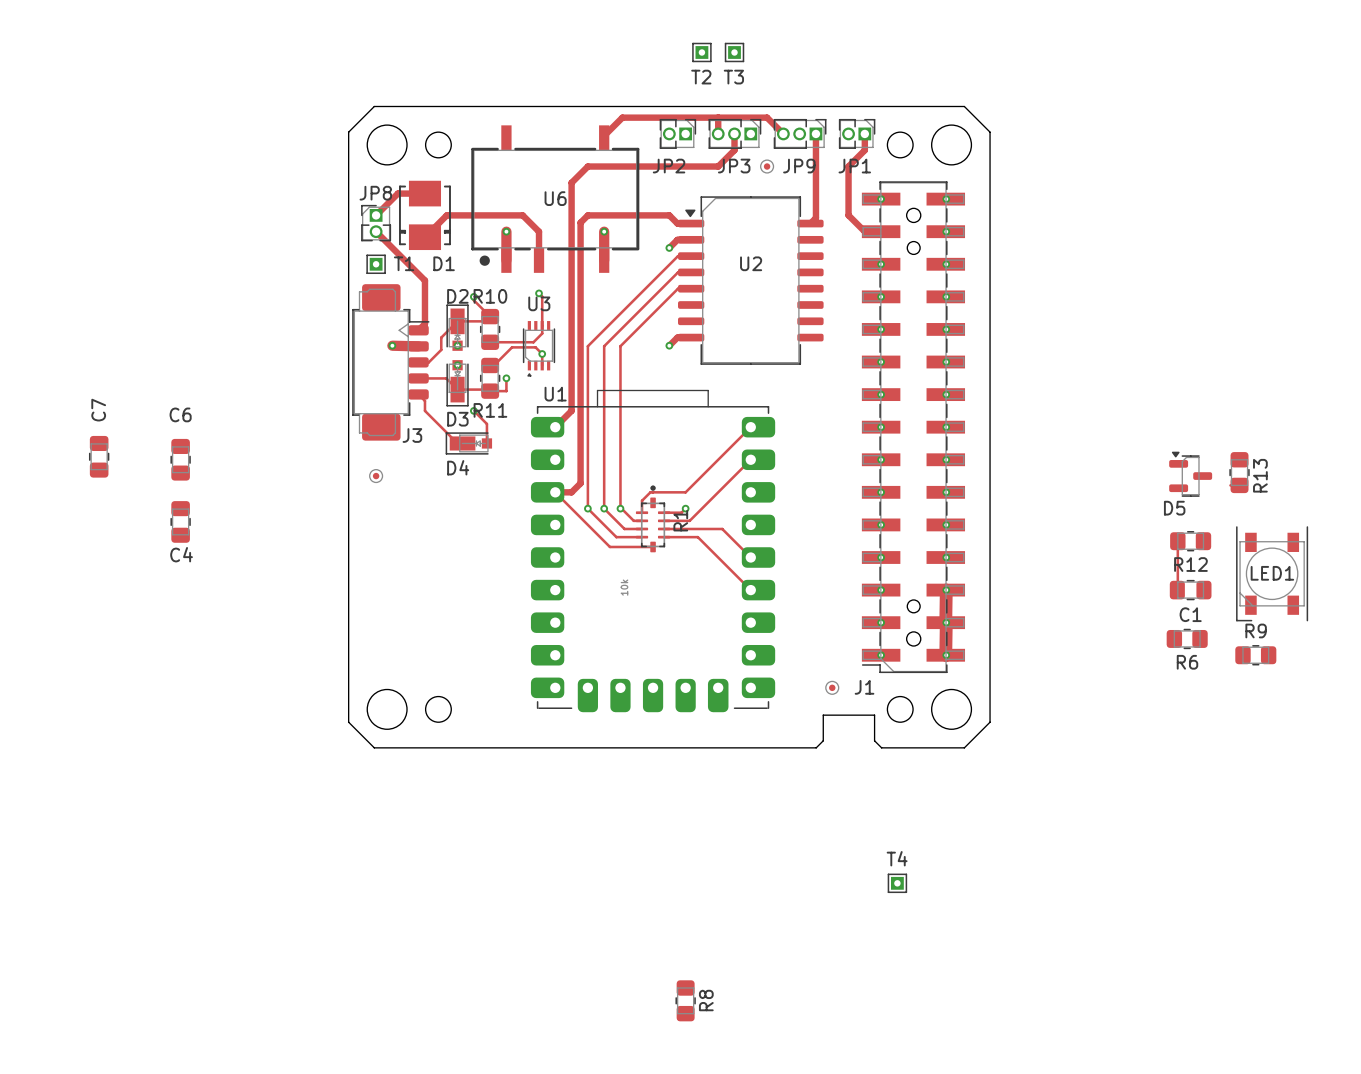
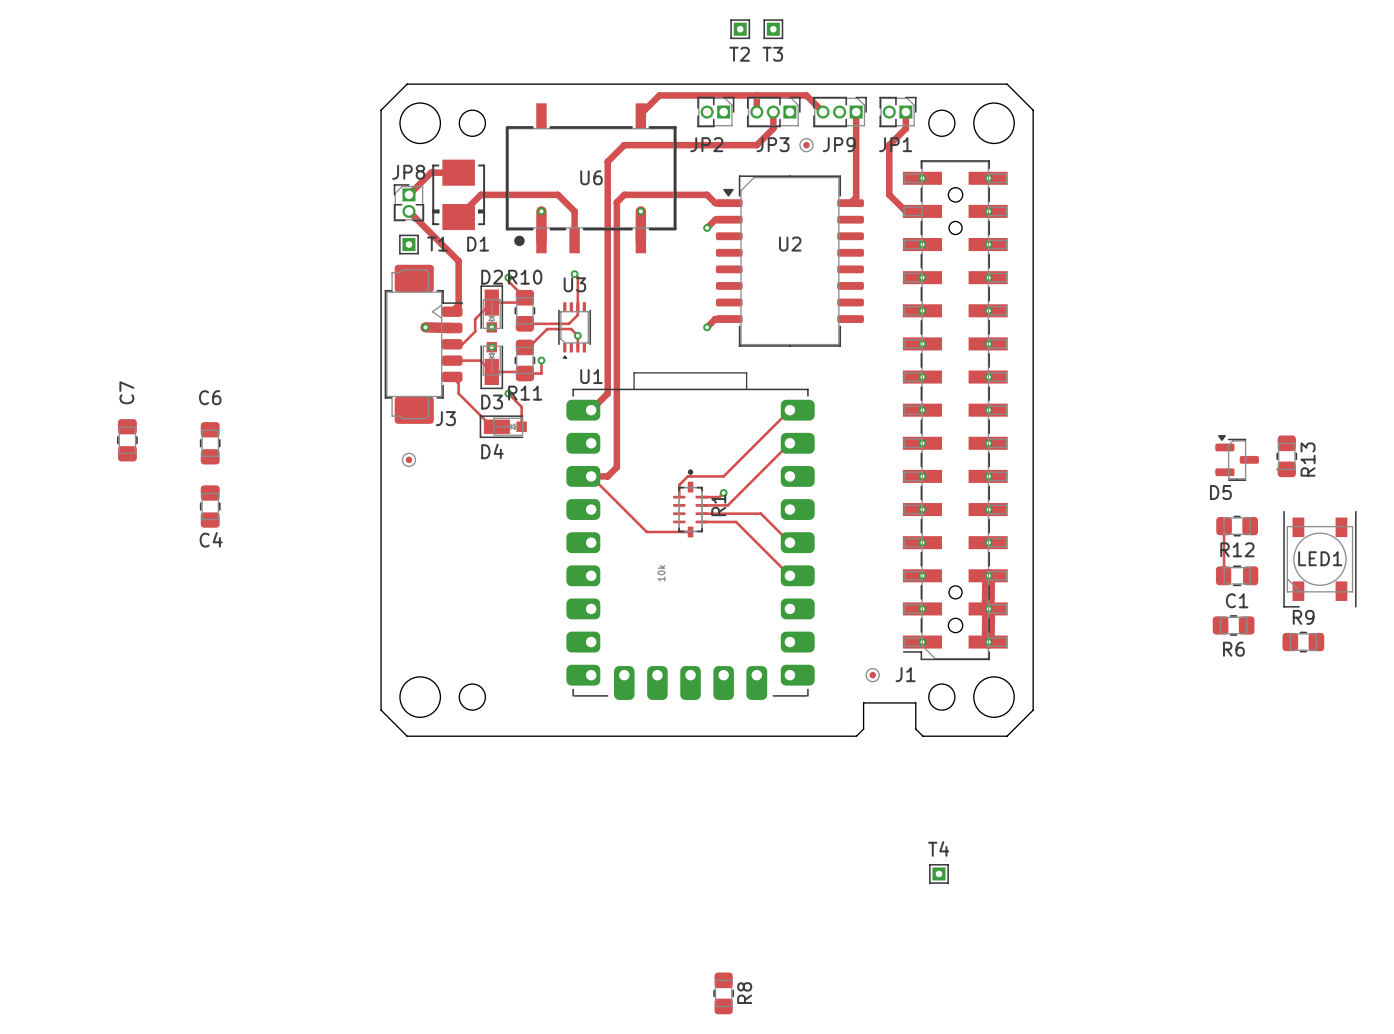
track: (691, 256) (678, 256) (587, 346) (587, 508) (616, 537) (642, 537) -> none
track: (691, 272) (678, 272) (604, 346) (604, 508) (624, 528) (642, 528) -> none
track: (691, 288) (678, 288) (620, 346) (620, 508) (633, 520) (642, 520) -> none
via: (587, 508) -> none
via: (604, 508) -> none
via: (620, 508) -> none

